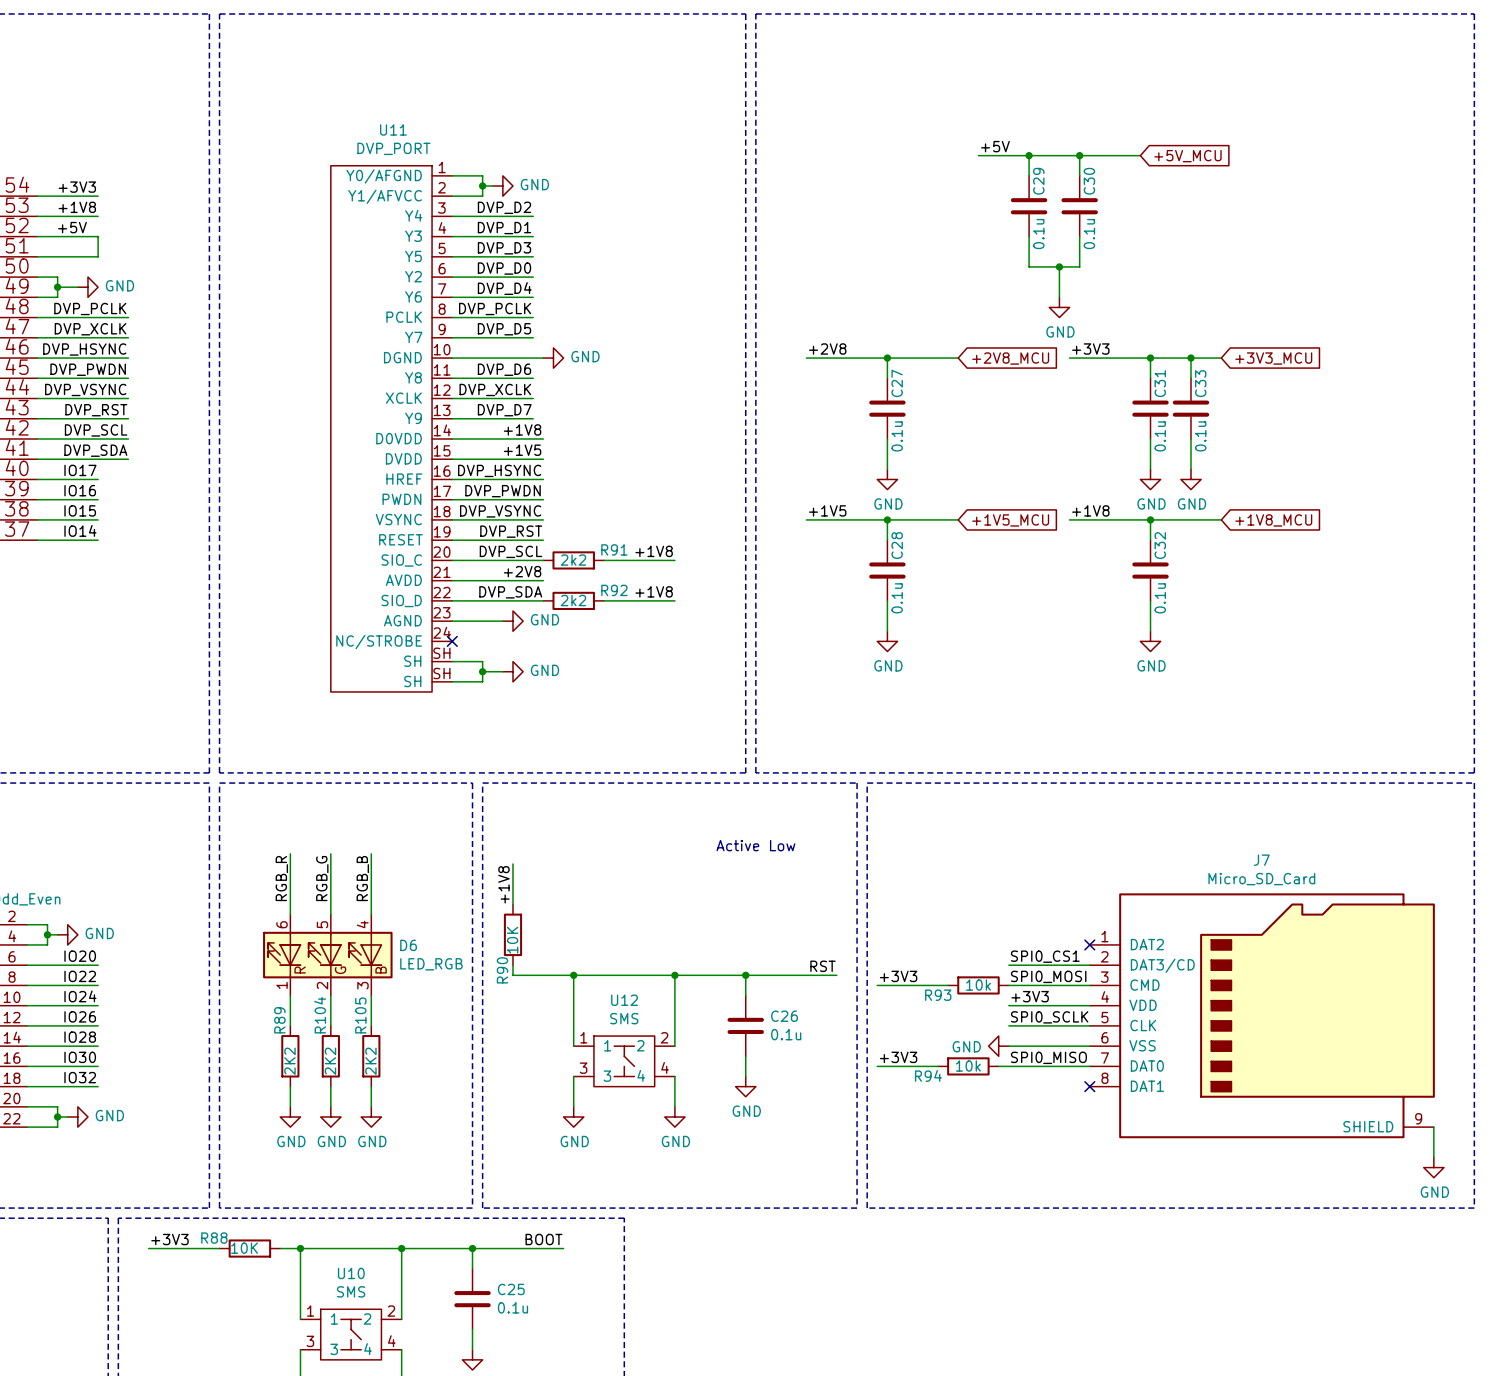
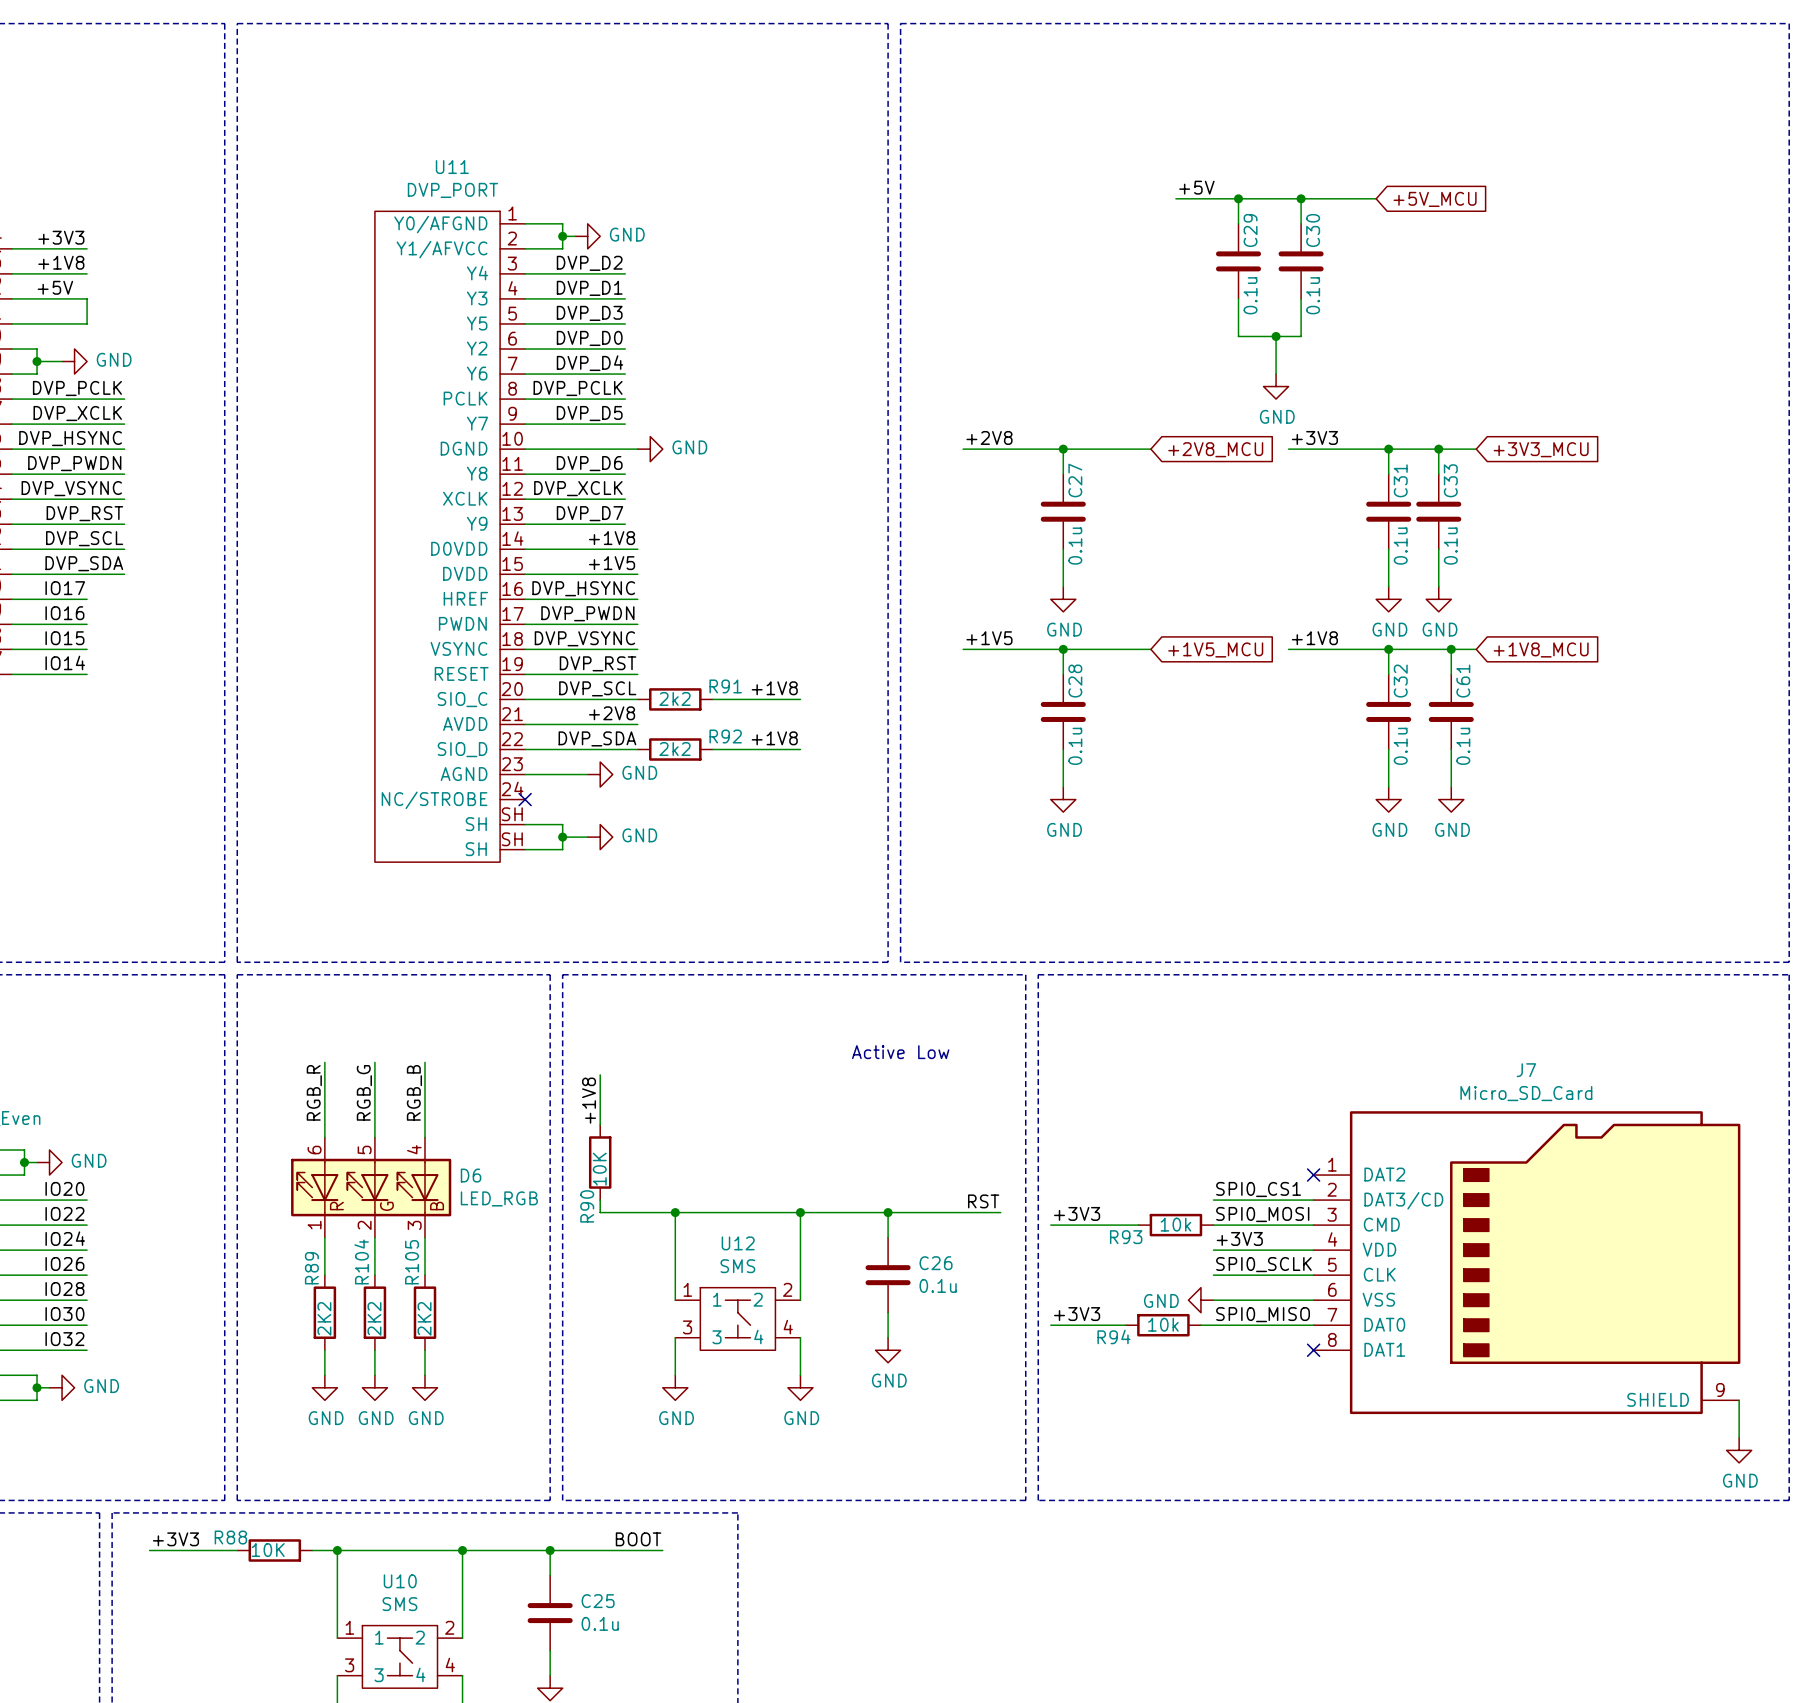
wire: none -> (1451, 649) (1451, 674)
junction: none -> (1451, 649)
C61: none -> 0.1u (1451, 711)
wire: none -> (1451, 749) (1451, 787)
power symbol: none -> GND (1451, 799)

